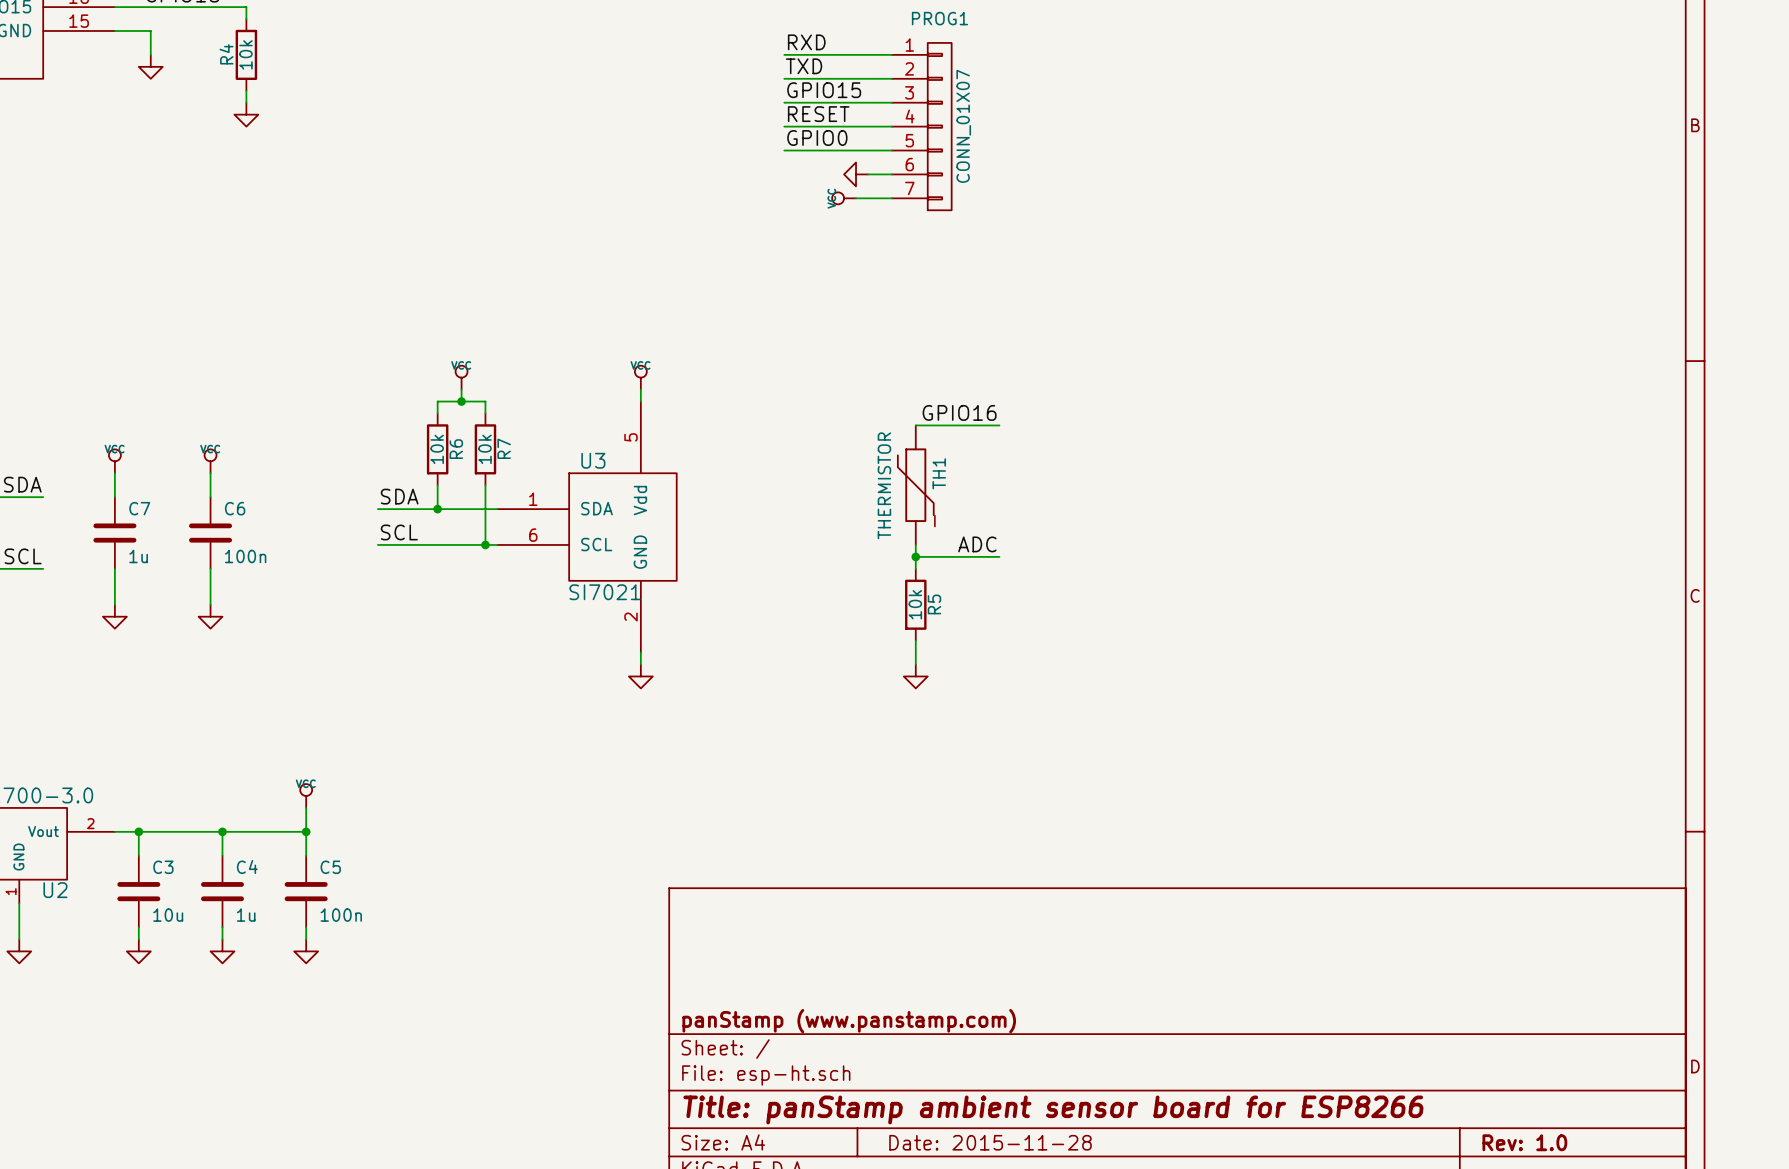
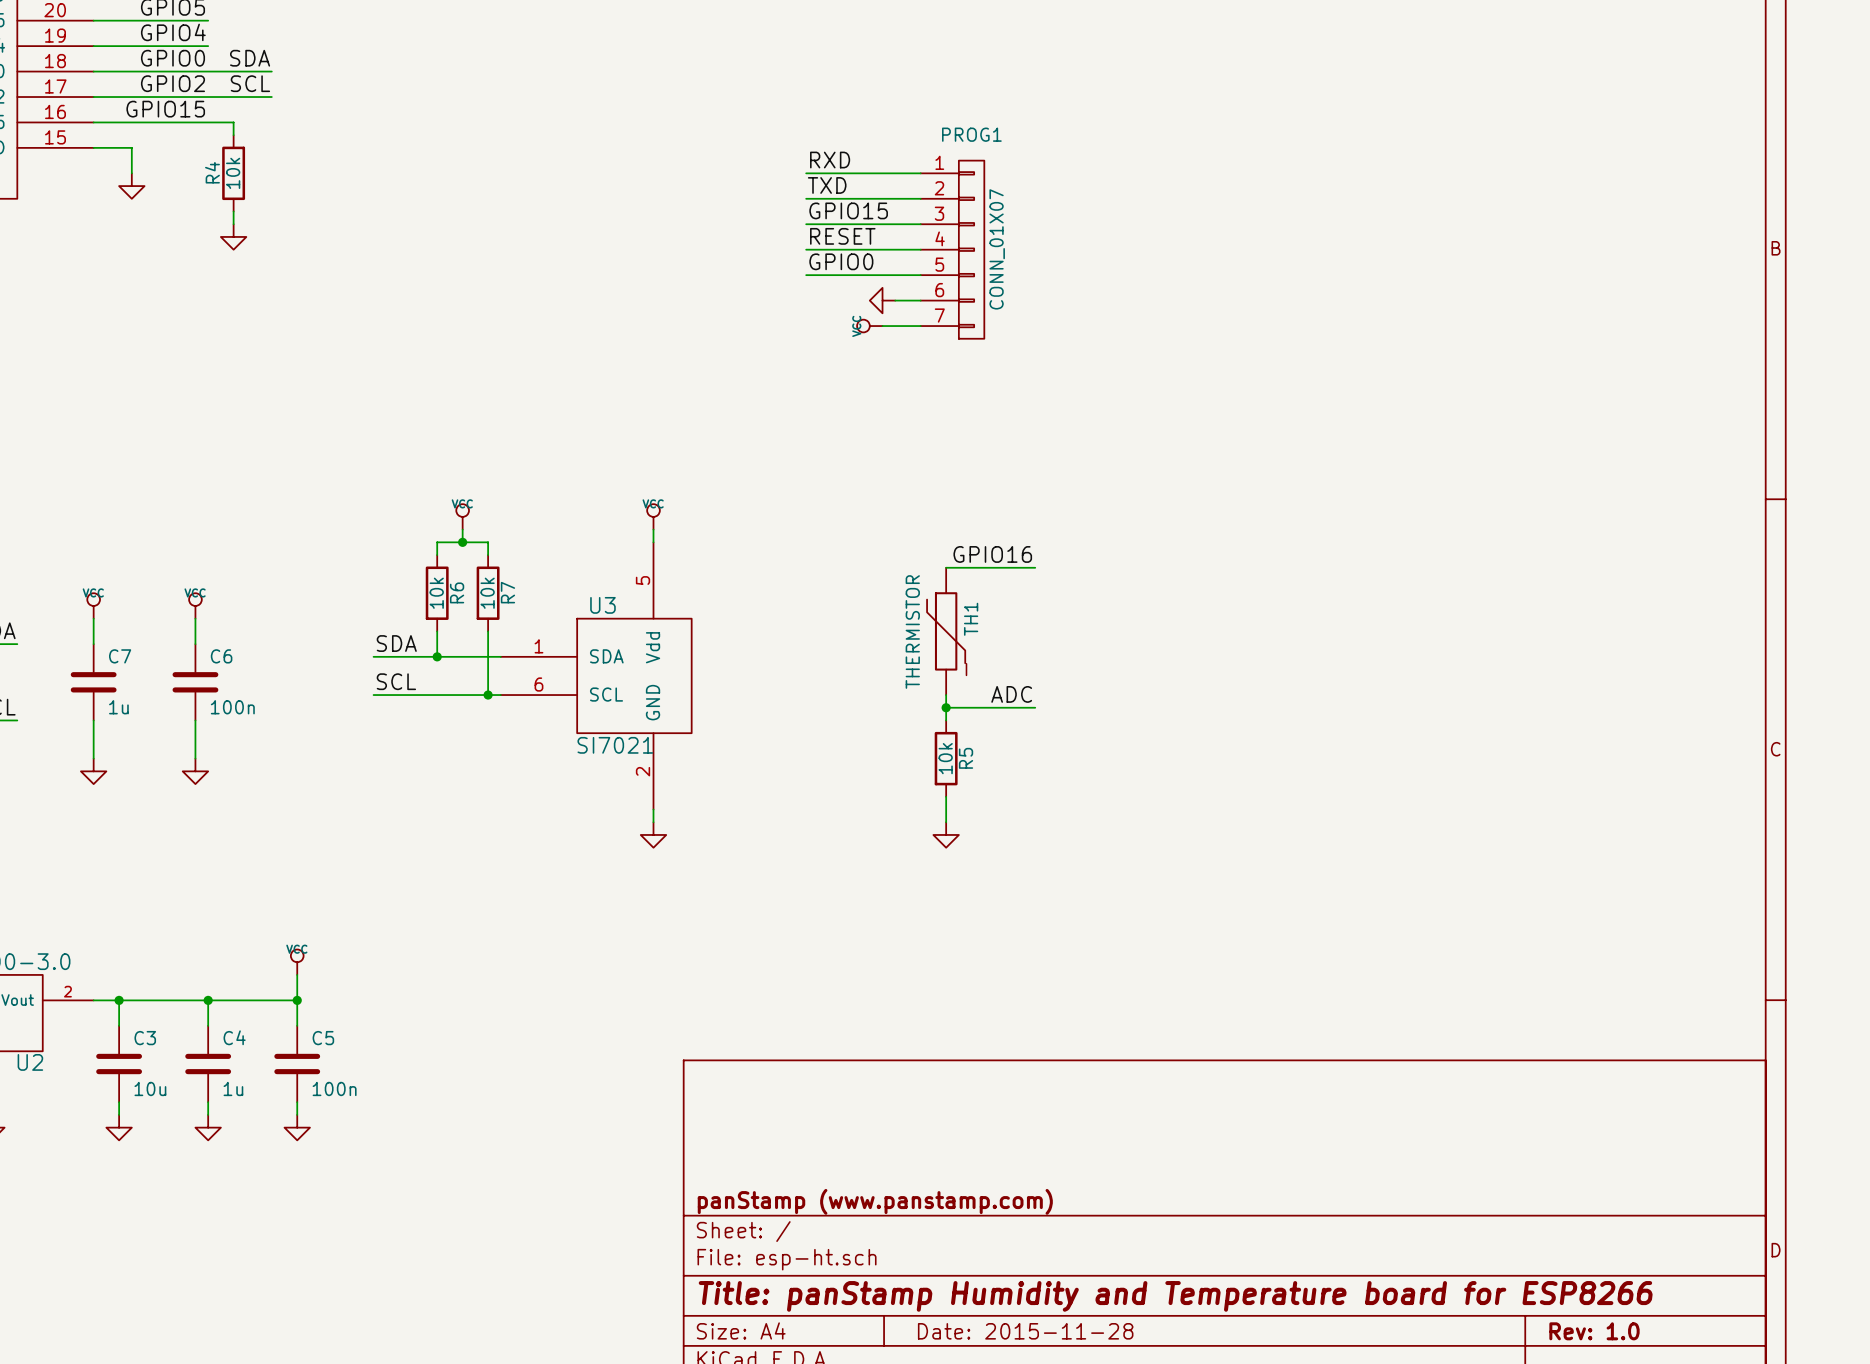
title block: Title: panStamp ambient sensor board for ESP8266 (1053, 1109) -> Title: panStamp Humidity and Temperature board for ESP8266 (1175, 1296)

